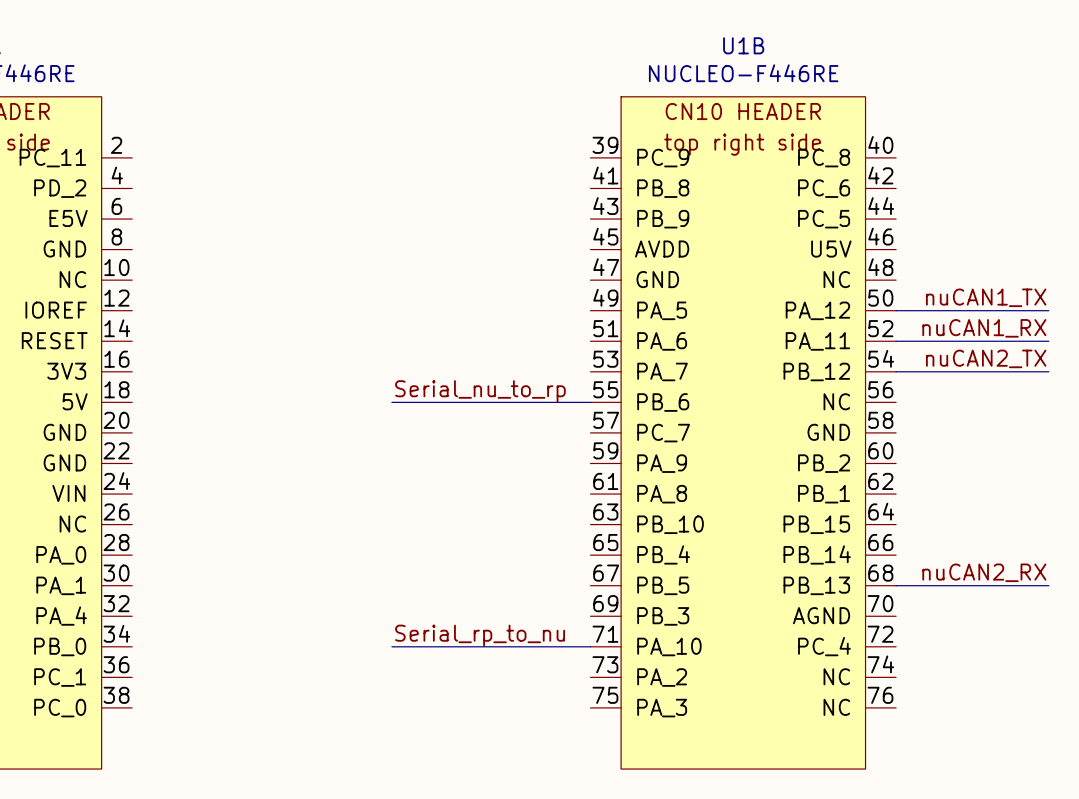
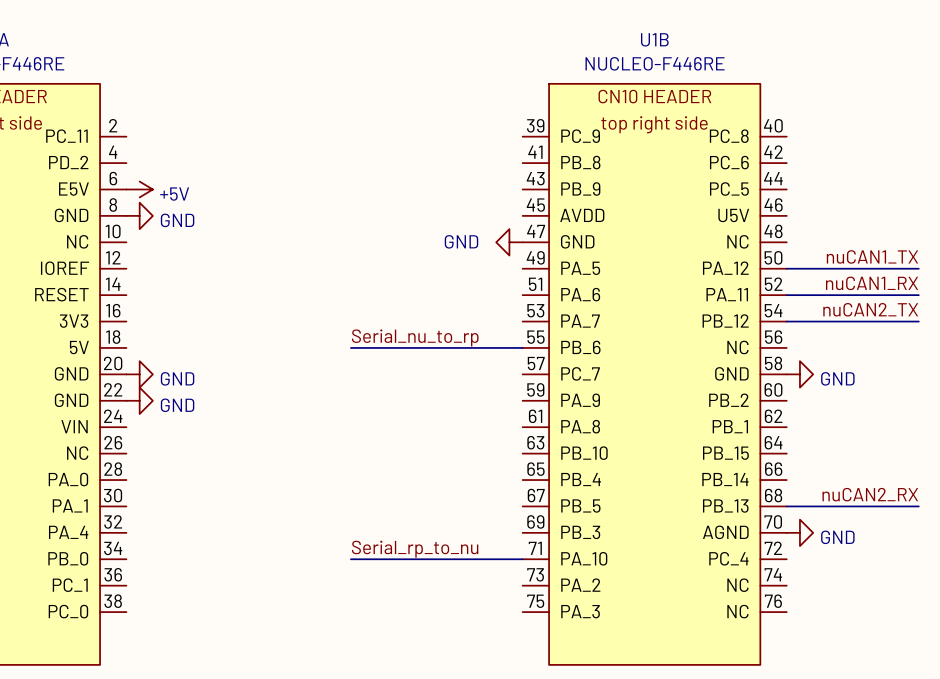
power symbol: none -> +5V (139, 189)
power symbol: none -> GND (139, 215)
power symbol: none -> GND (509, 242)
power symbol: none -> GND (139, 374)
power symbol: none -> GND (799, 374)
power symbol: none -> GND (139, 400)
power symbol: none -> GND (799, 532)

